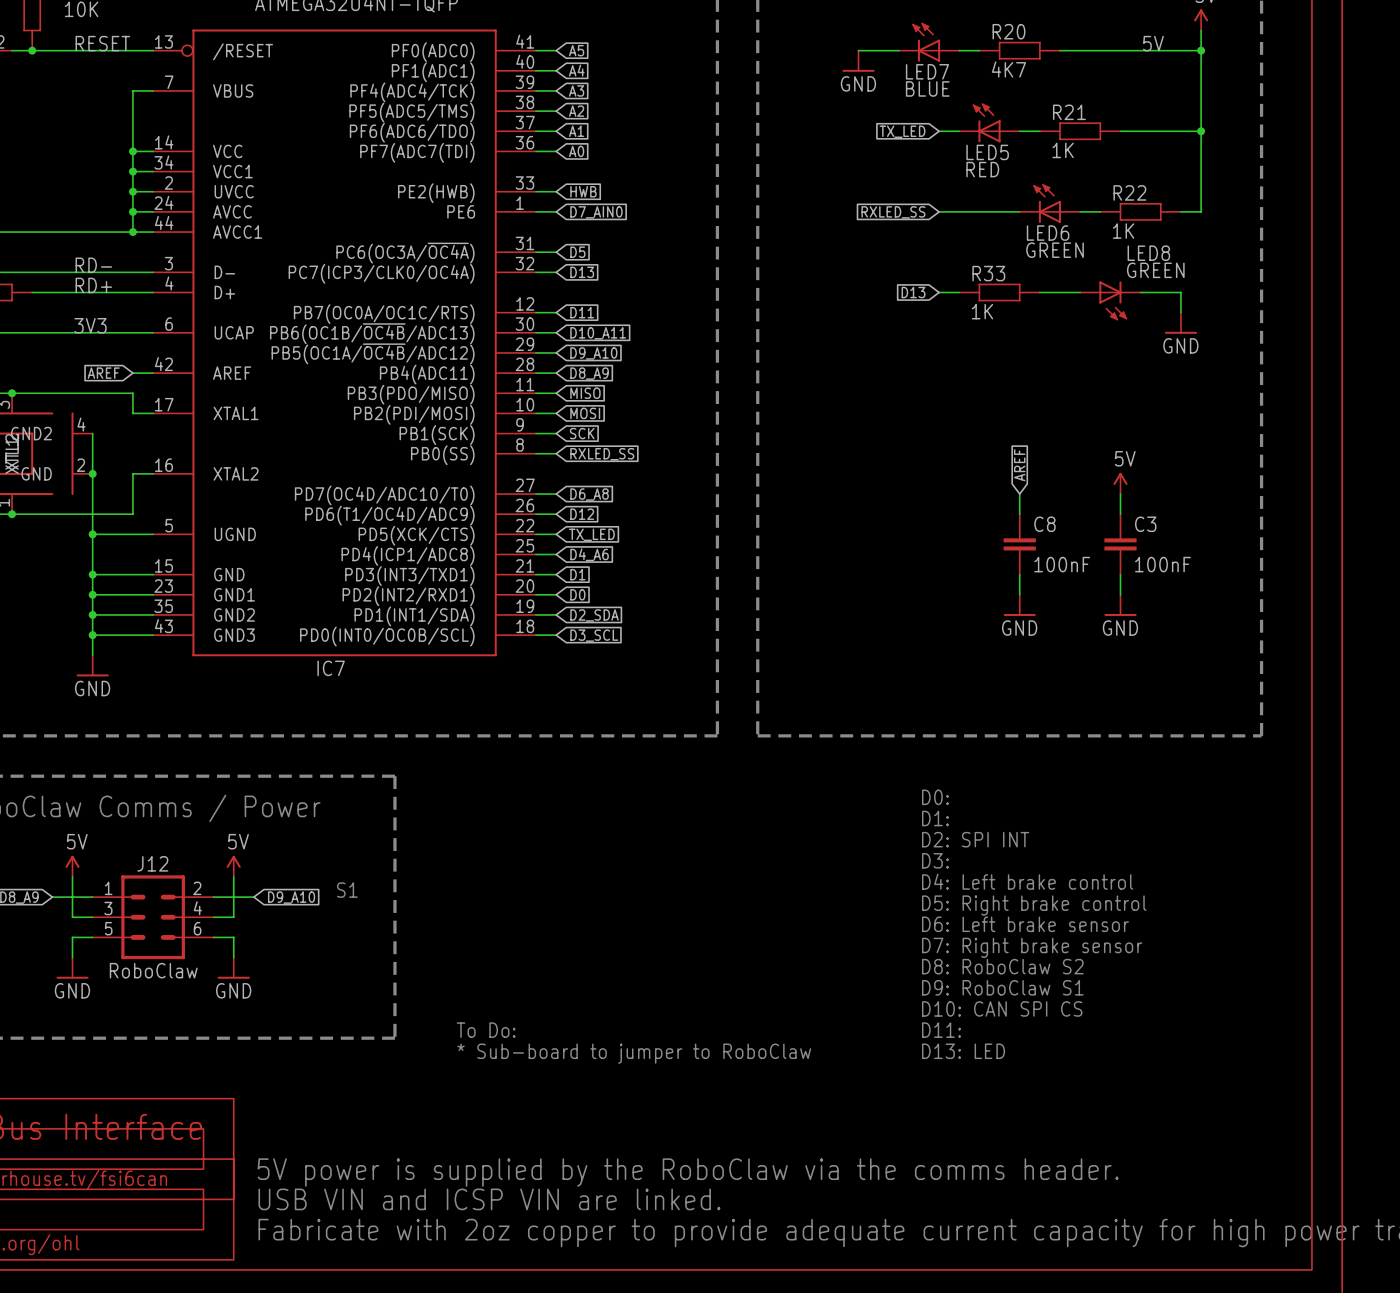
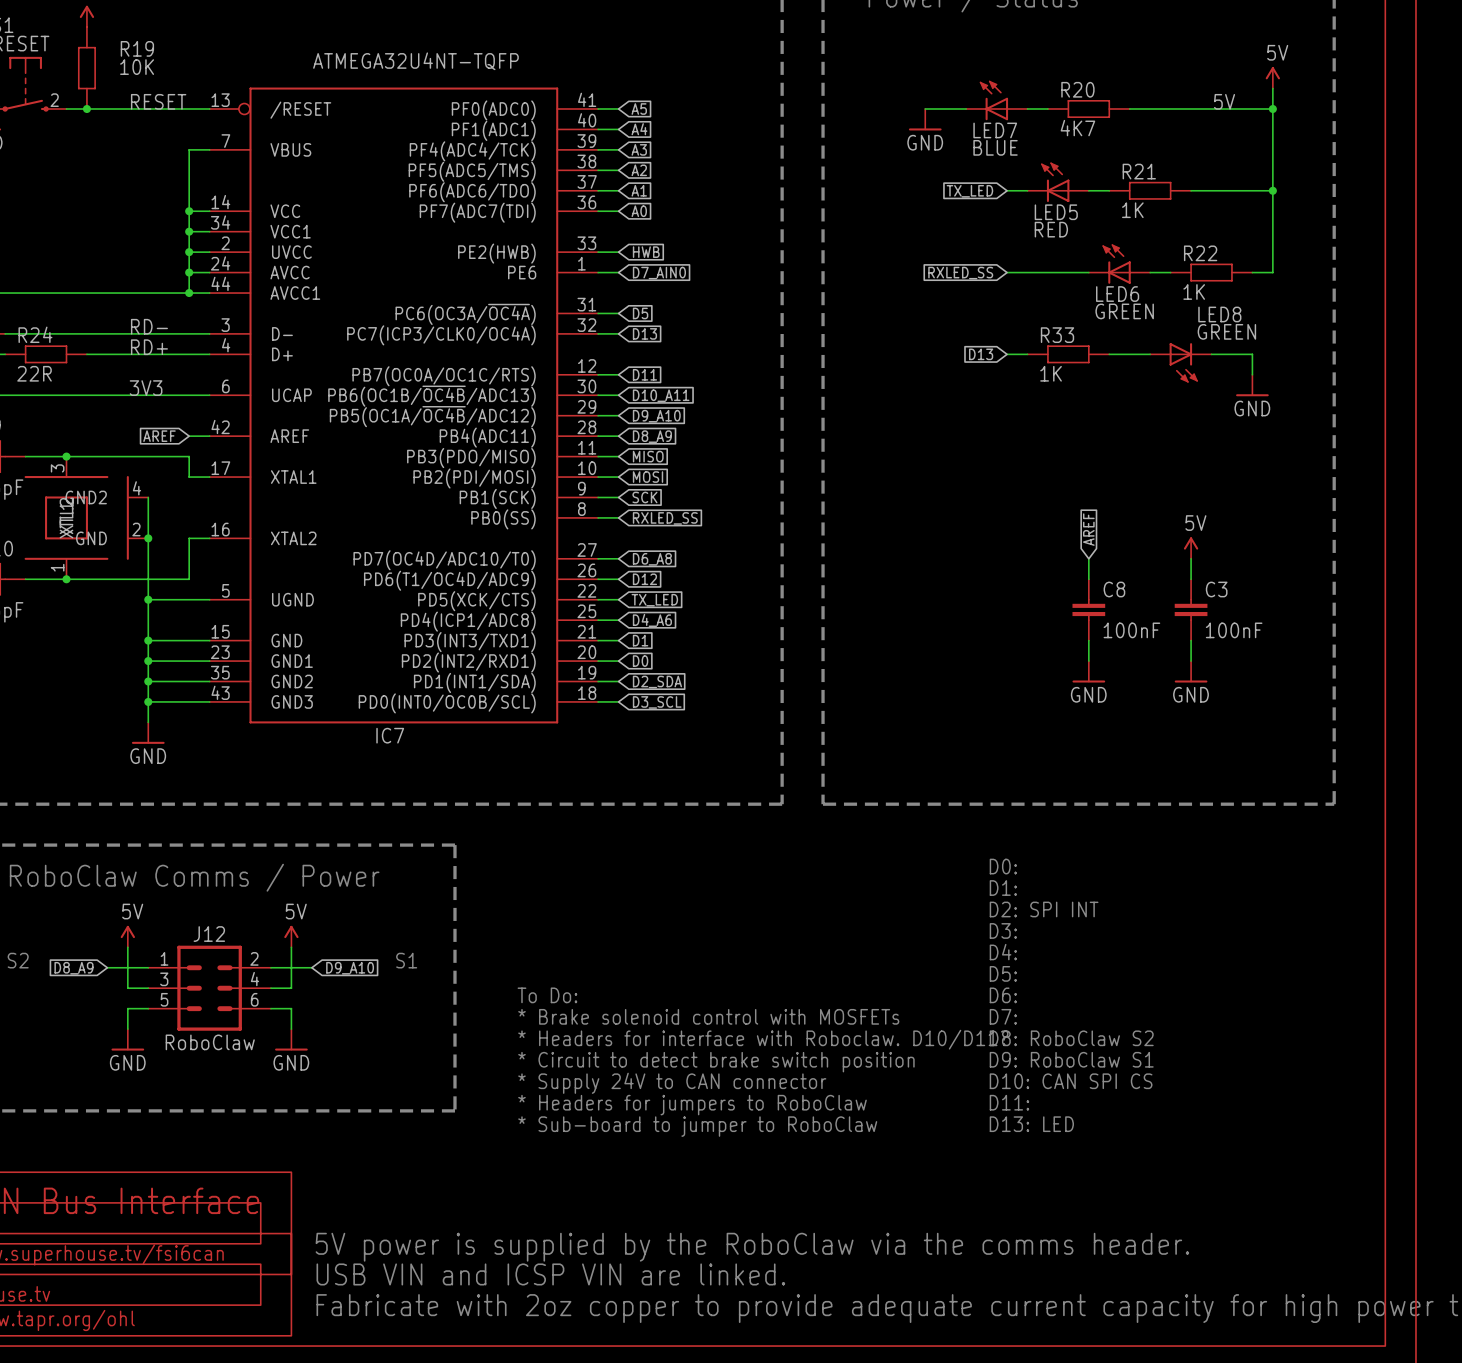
text: D4: Left brake control (1027, 881) -> D4: (1003, 952)
text: D5: Right brake control (1034, 905) -> D5: (1003, 973)
text: none -> To Do: (547, 995)
text: D6: Left brake sensor (1025, 924) -> D6: (1003, 995)
text: none -> * Brake solenoid control with MOSFETs (708, 1016)
text: D7: Right brake sensor (1032, 947) -> D7: (1003, 1016)
text: none -> * Headers for interface with Roboclaw. D10/D11? (763, 1039)
text: none -> * Circuit to detect brake switch position (716, 1062)
text: none -> * Supply 24V to CAN connector (672, 1083)
text: To Do: (486, 1030) -> * Headers for jumpers to RoboClaw (692, 1105)

